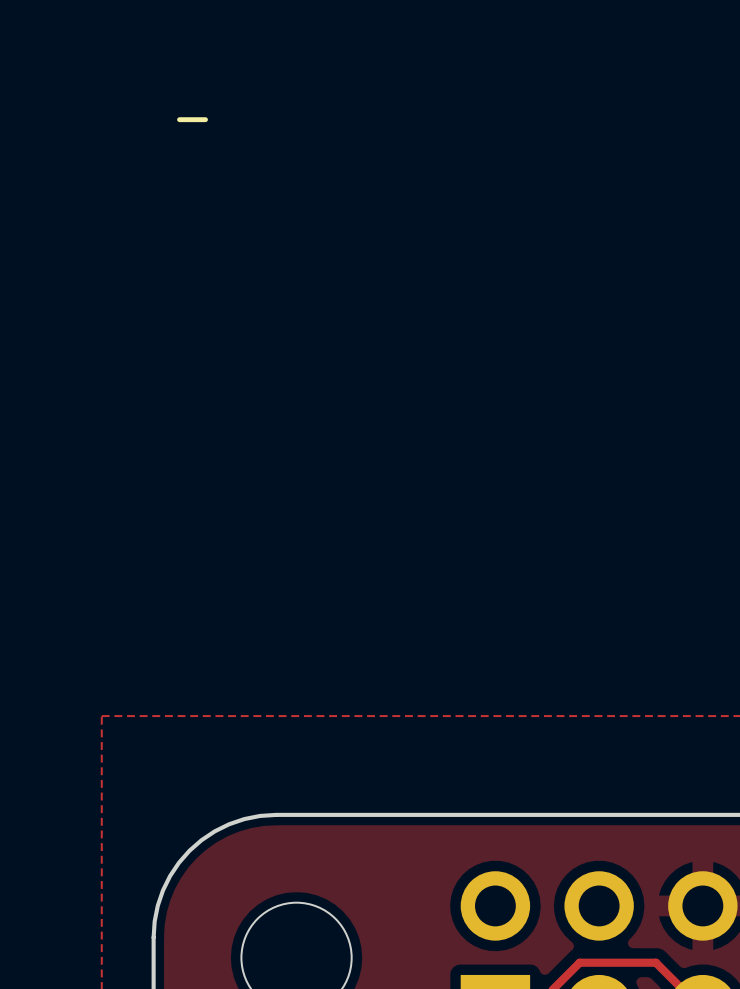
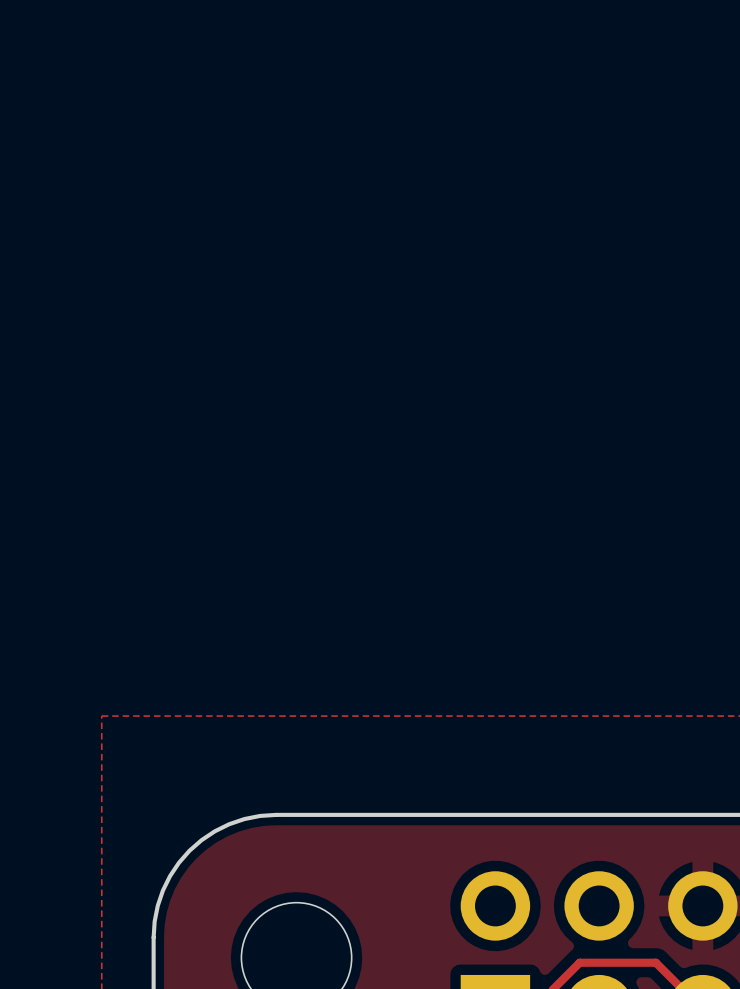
line: (179, 119) (205, 119) -> none

